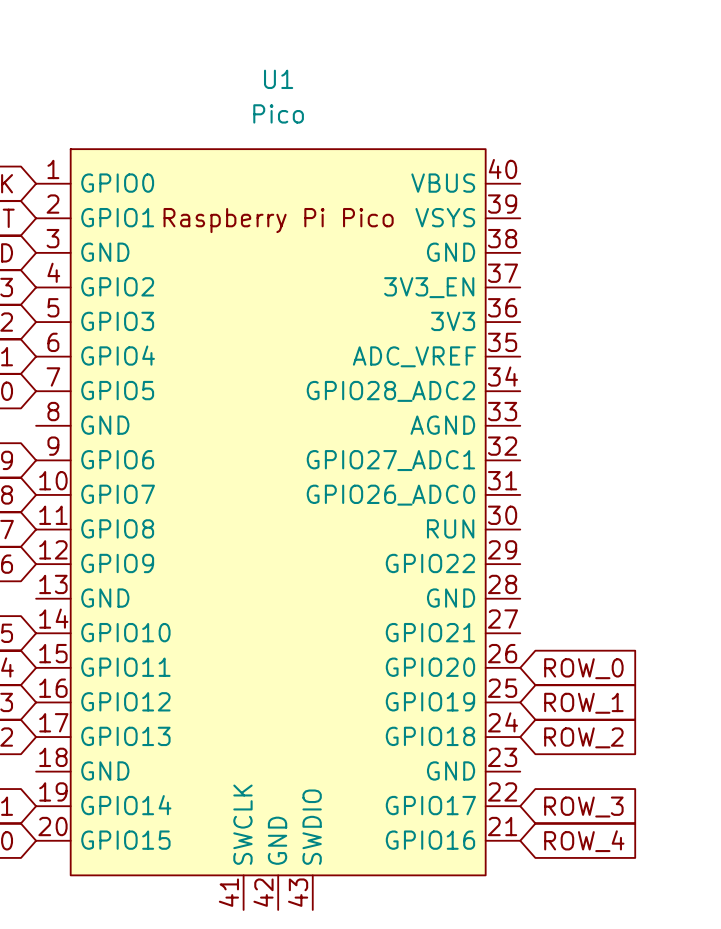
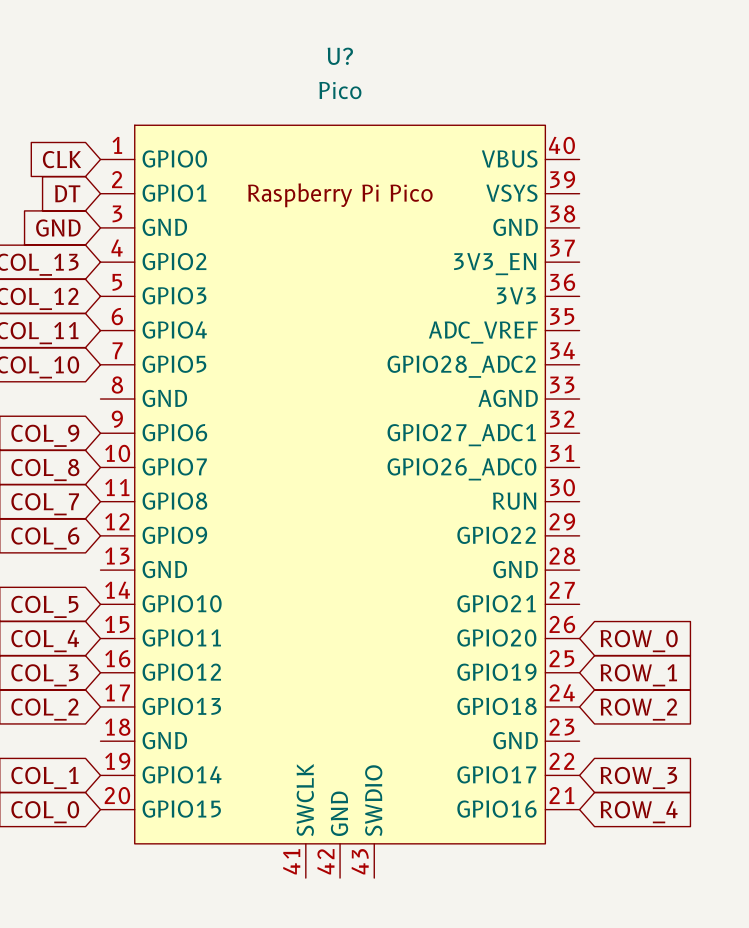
U1 name: U1 (278, 79) -> U? (340, 56)

